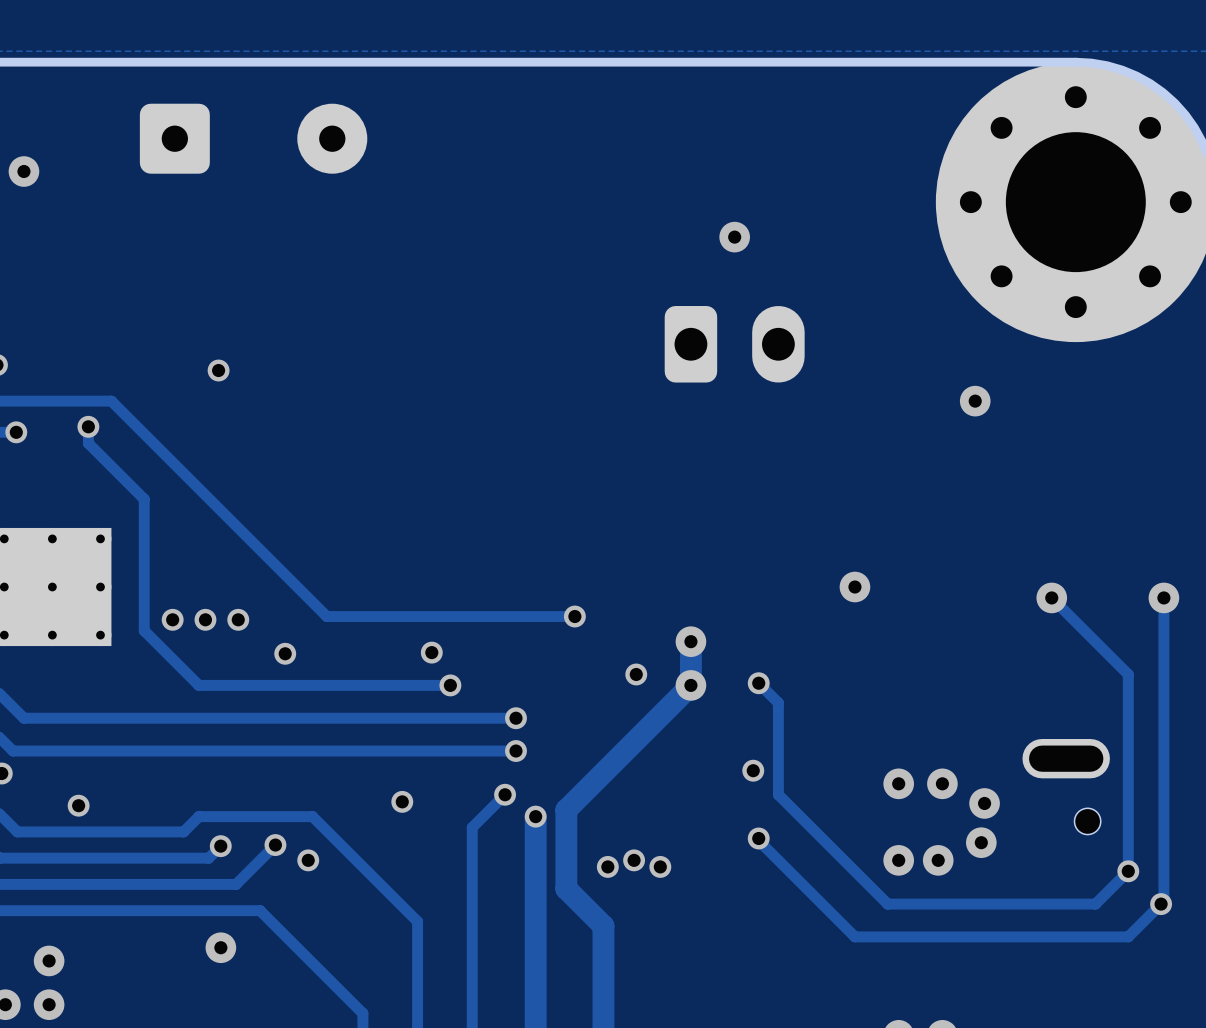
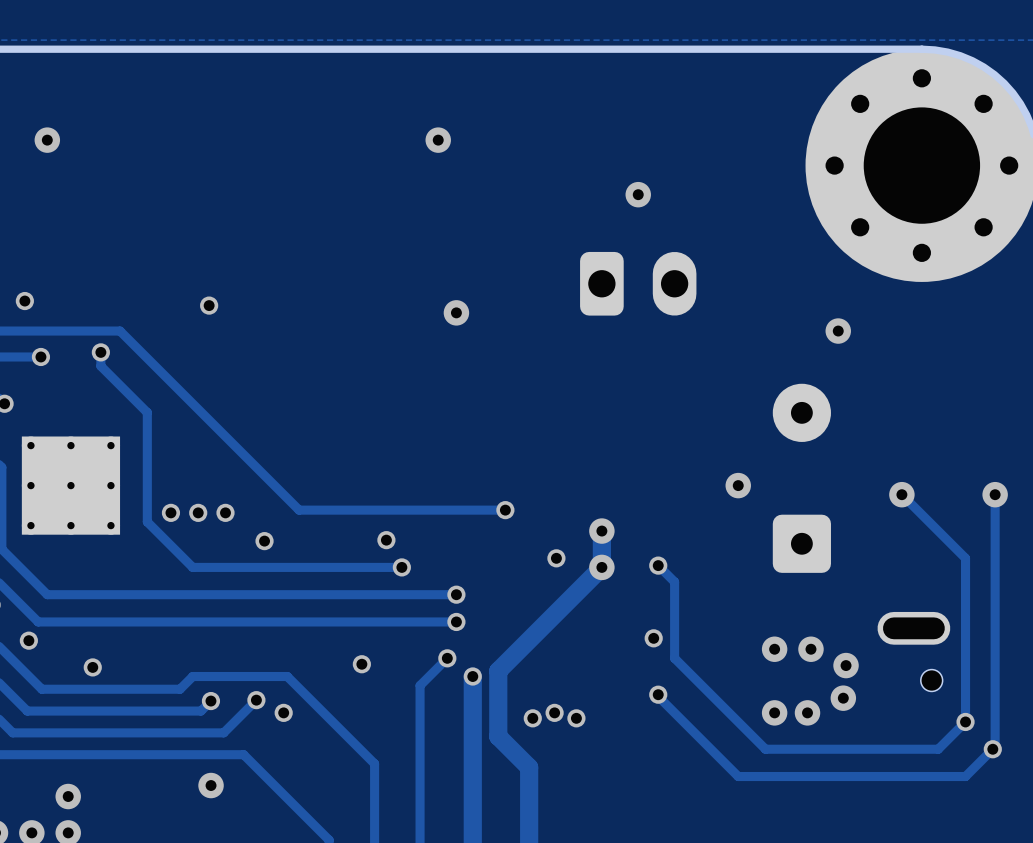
part rotation: 0° (253, 138) -> 90° counterclockwise (801, 478)
part position: (253, 138) -> (801, 478)
via: none -> (438, 140)
via: none -> (456, 312)

